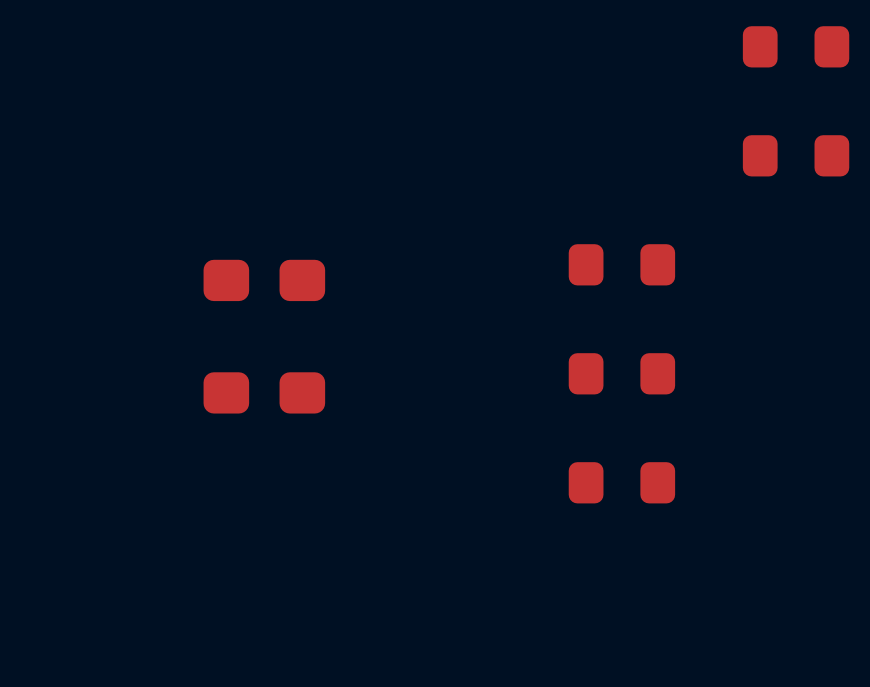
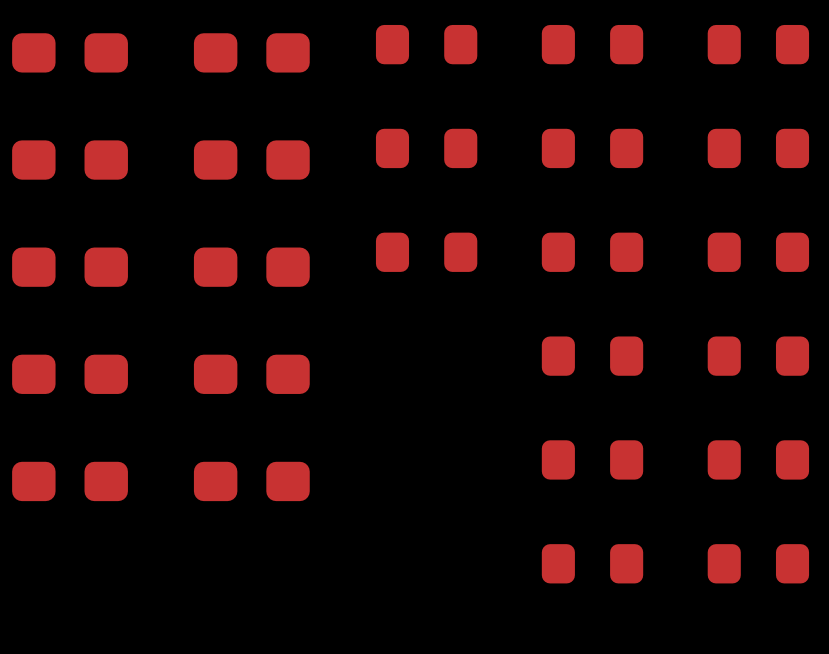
part: none -> (426, 44)
part: none -> (592, 44)
part: none -> (70, 52)
part: none -> (251, 52)
part: none -> (426, 148)
part: none -> (592, 148)
part: none -> (70, 160)
part: none -> (251, 160)
part: none -> (426, 252)
part: none -> (758, 252)
part: none -> (70, 267)
part: none -> (758, 356)
part: none -> (70, 374)
part: none -> (758, 459)
part: none -> (70, 481)
part: none -> (251, 481)
part: none -> (592, 563)
part: none -> (758, 563)

